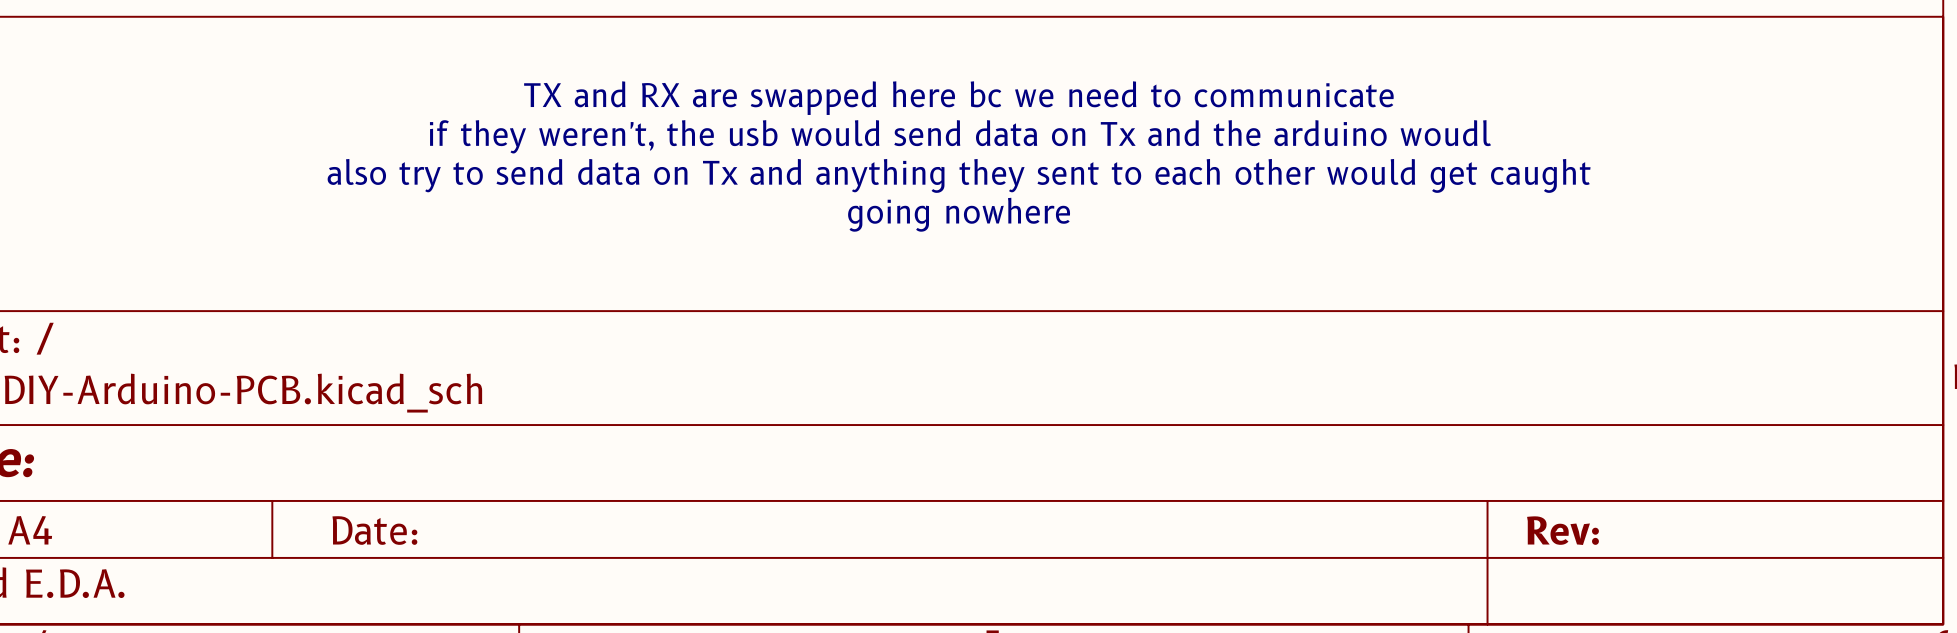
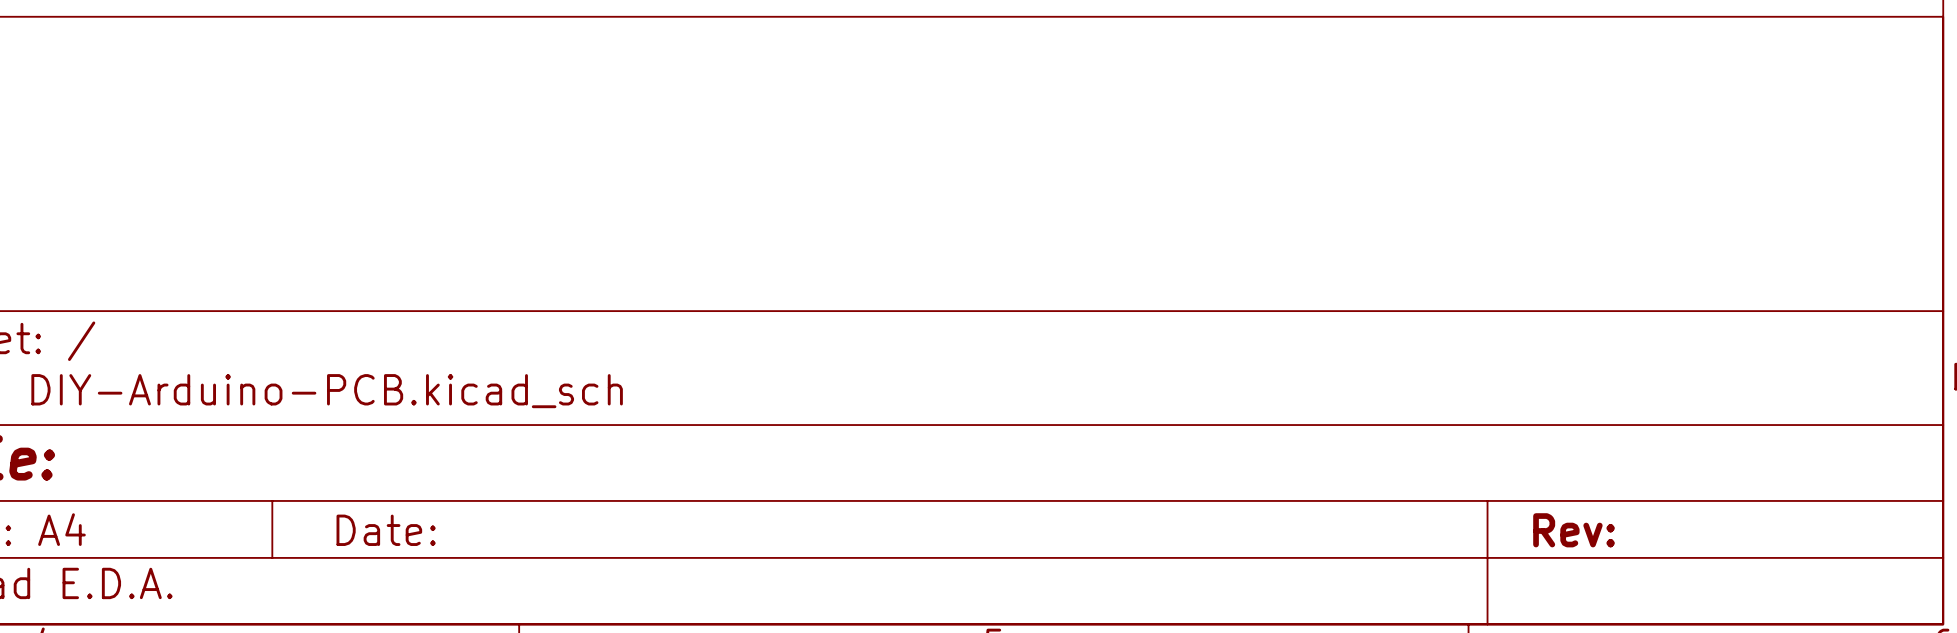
text: TX and RX are swapped here bc we need to communicate (958, 98) -> none
text: if they weren't, the usb would send data on Tx and the arduino woudl (960, 136) -> none
text: also try to send data on Tx and anything they sent to each other would get caught (959, 175) -> none
text: going nowhere (959, 214) -> none

